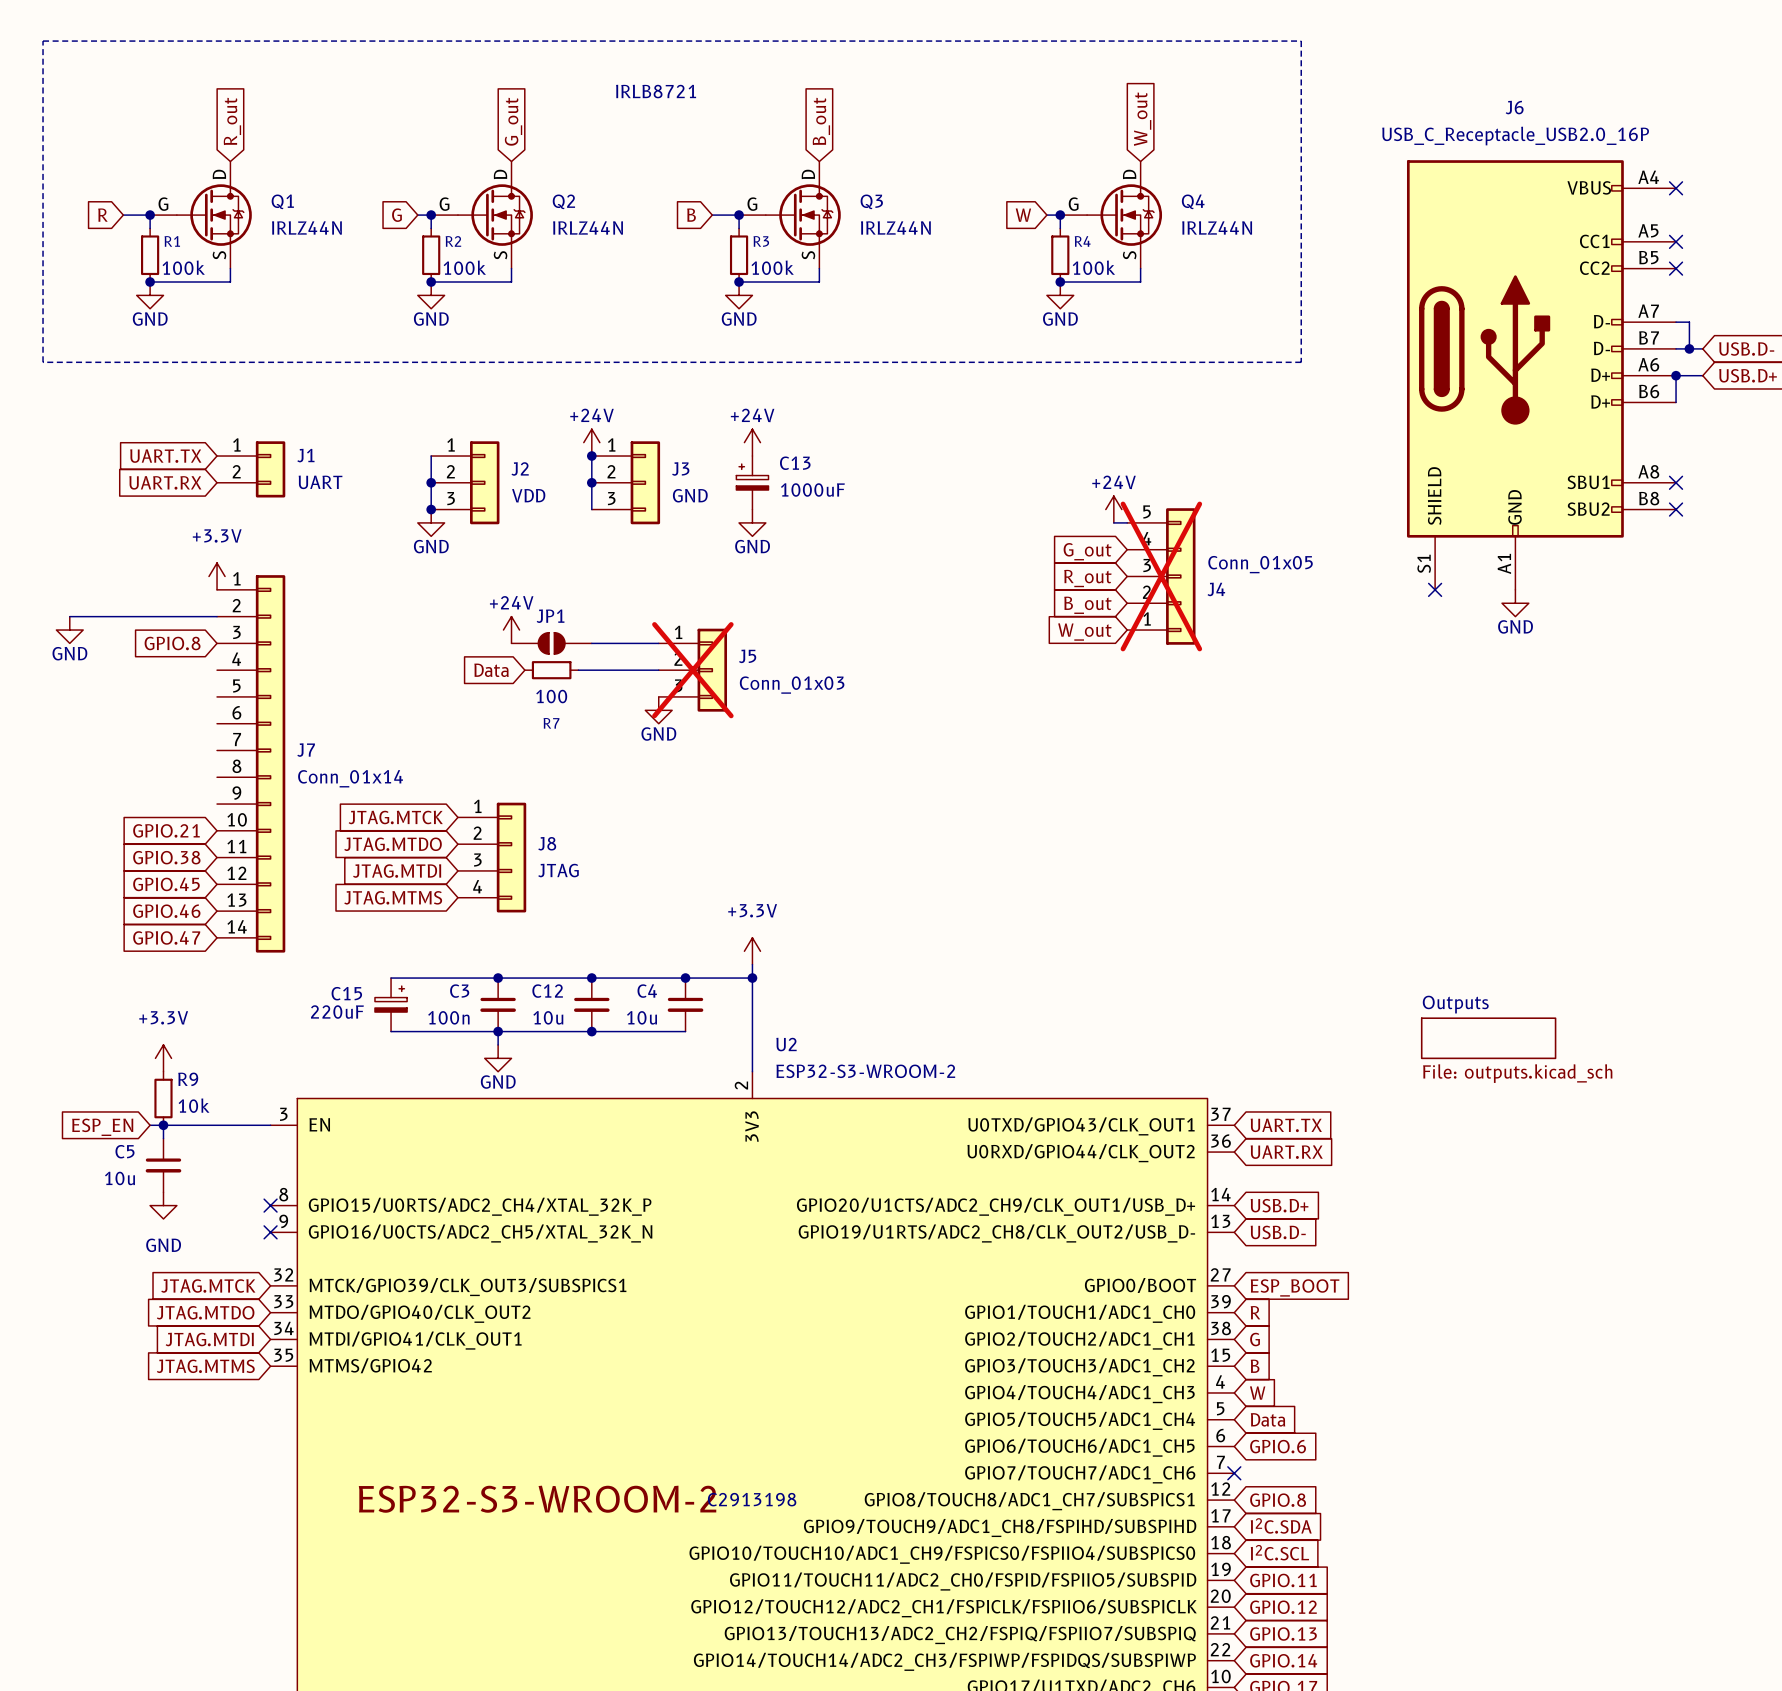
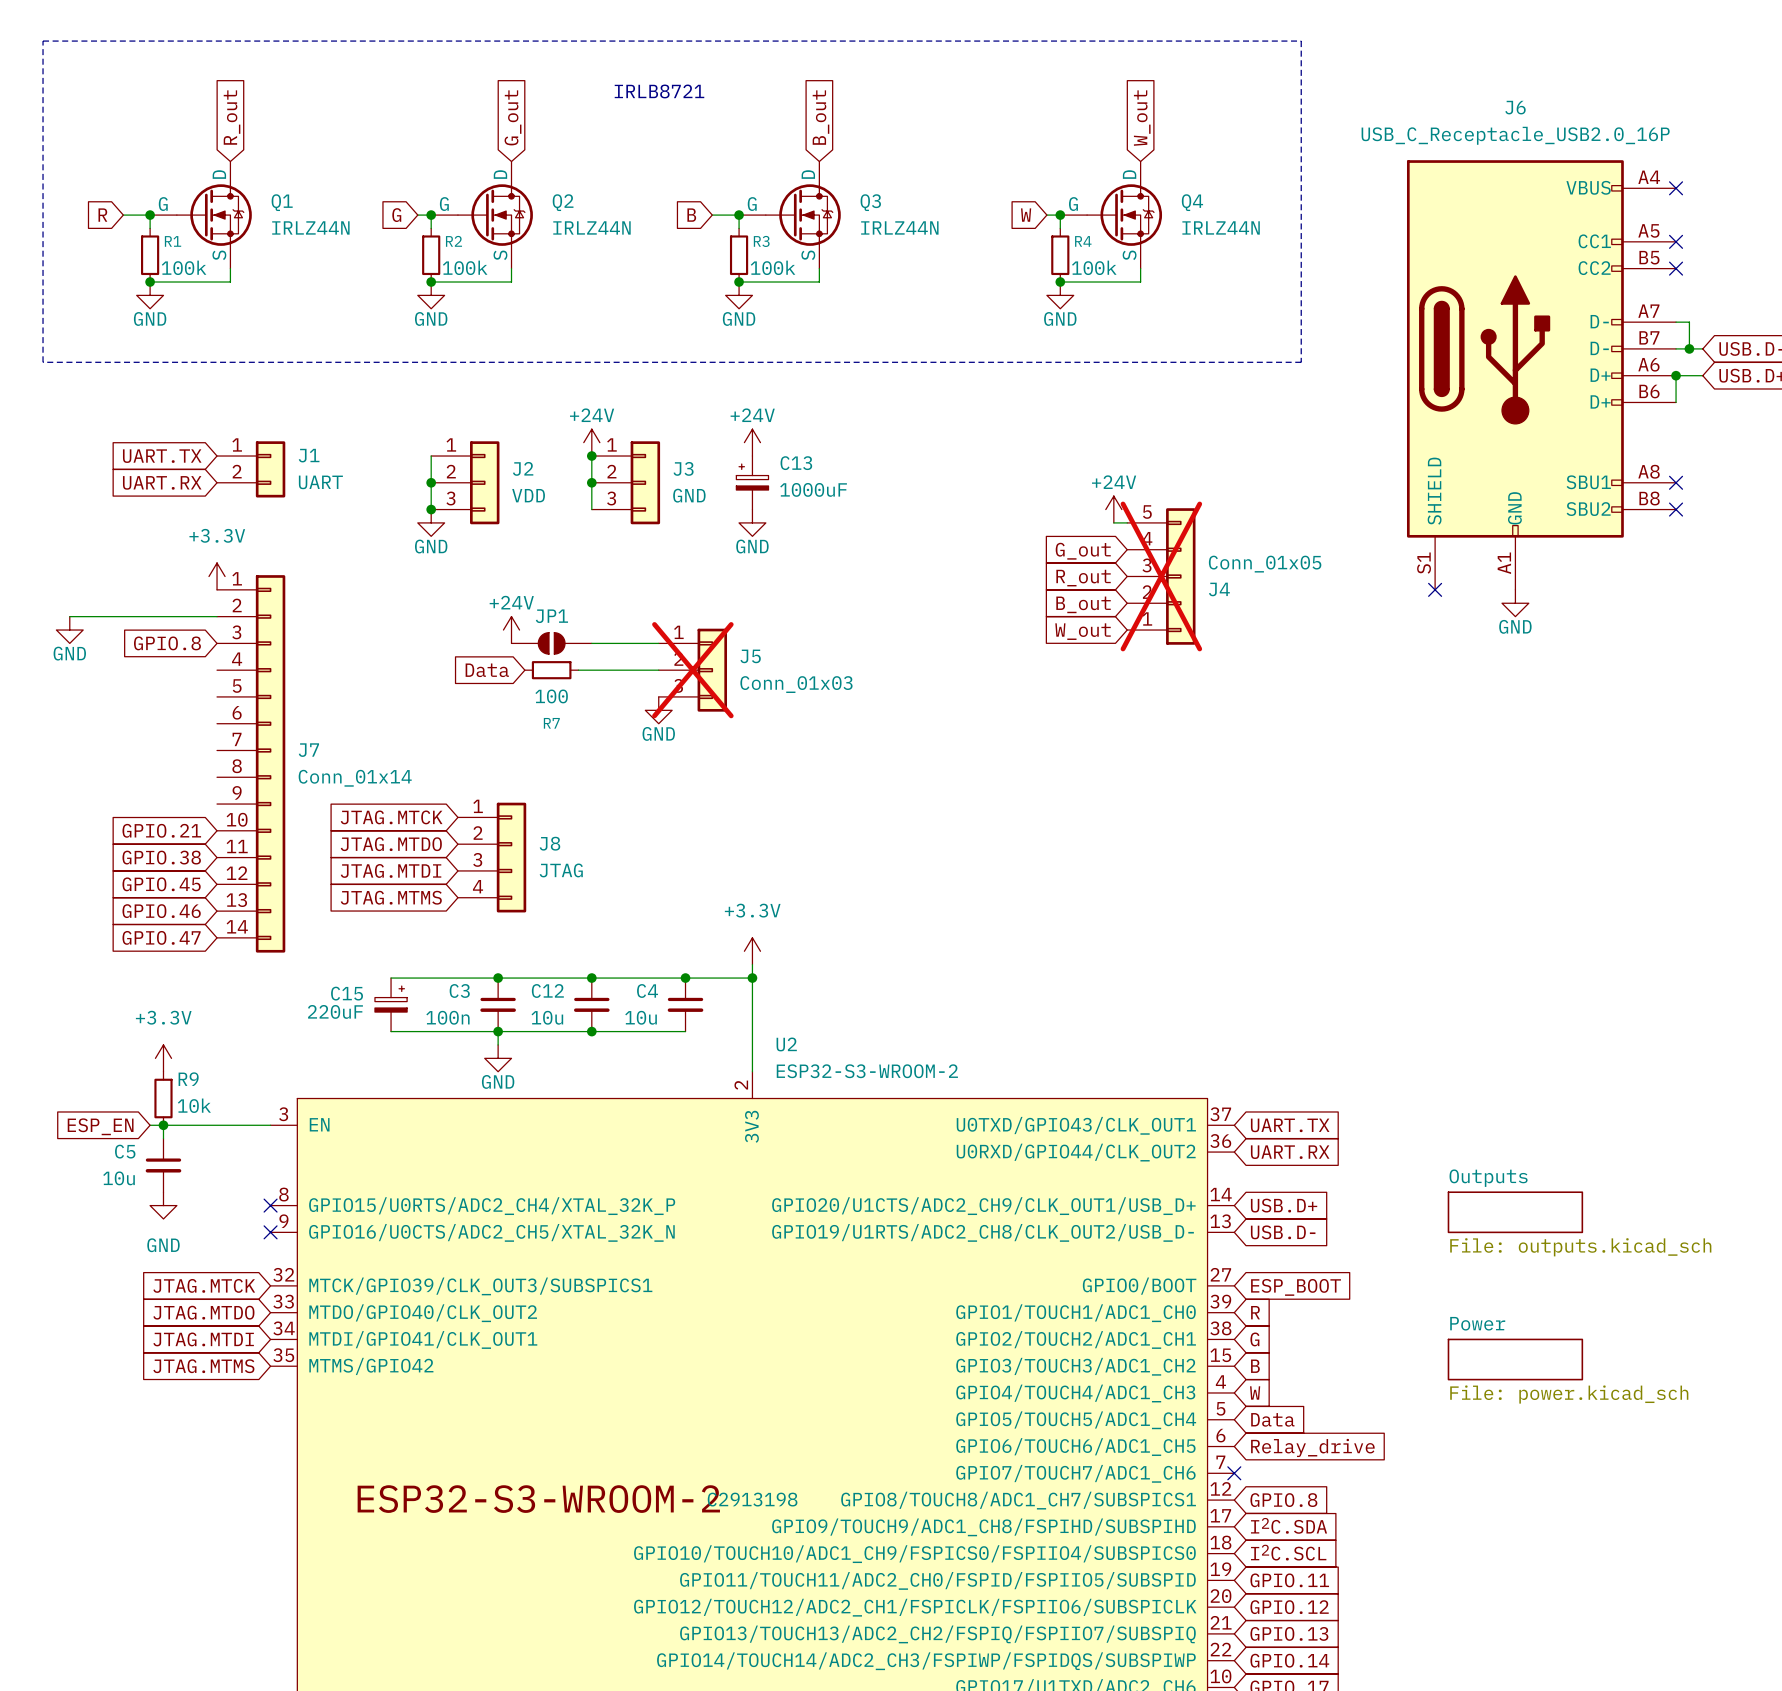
sheet Outputs position: (1488, 1038) -> (1515, 1212)
sheet Power: none -> File: power.kicad_sch (1515, 1359)
global label: GPIO.6 (1278, 1446) -> Relay_drive (1312, 1447)

